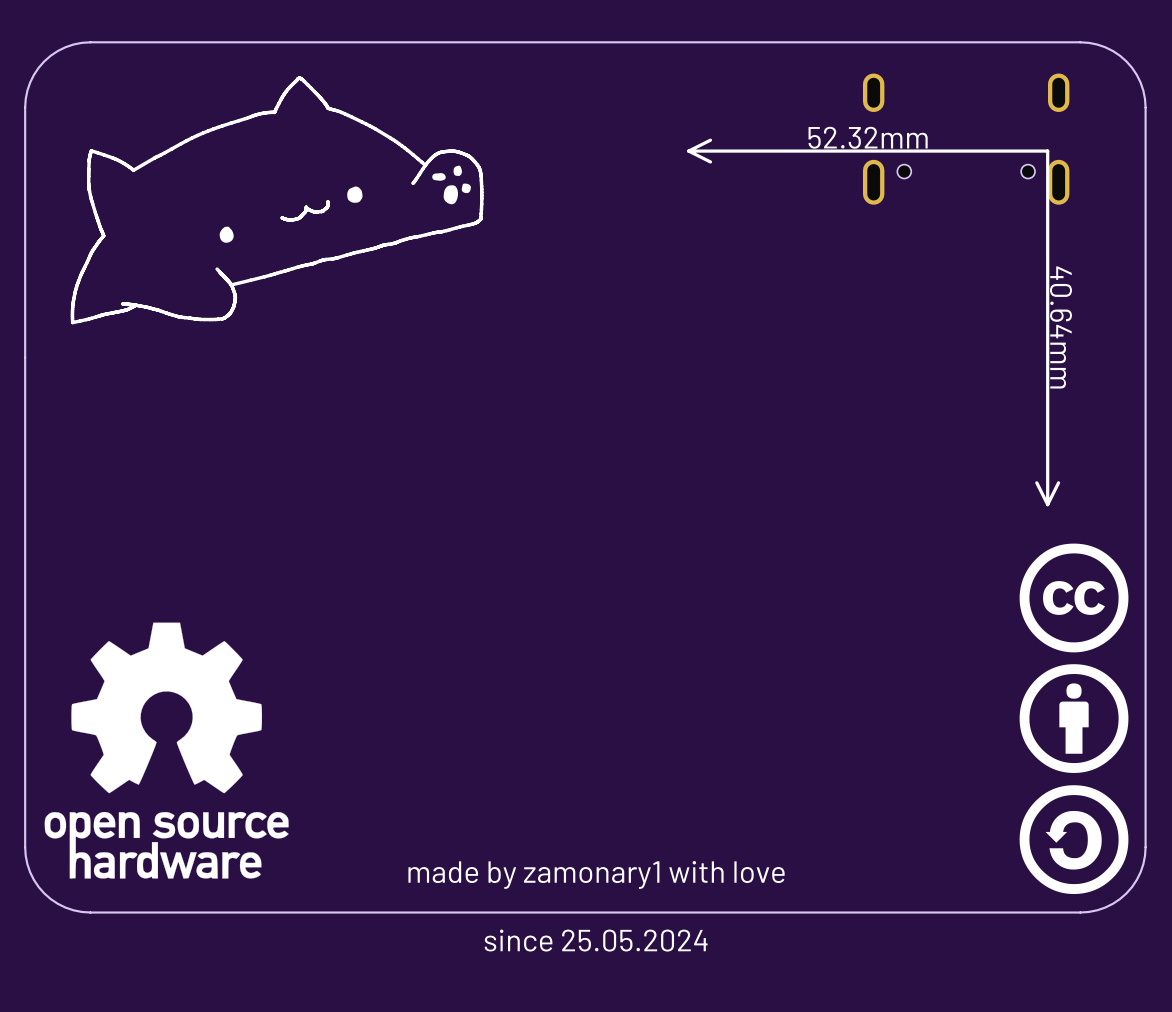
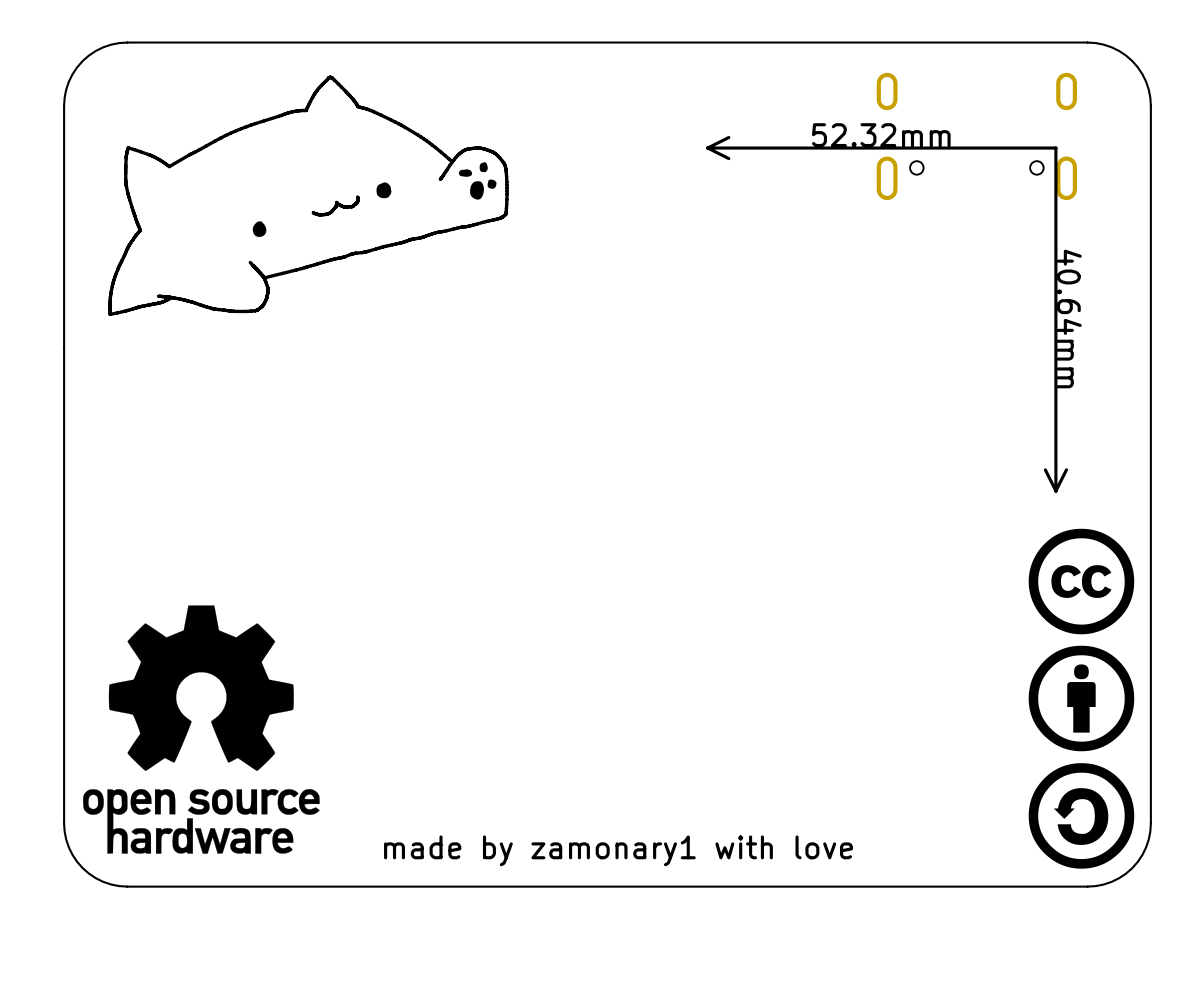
text: since 25.05.2024 (596, 940) -> none

